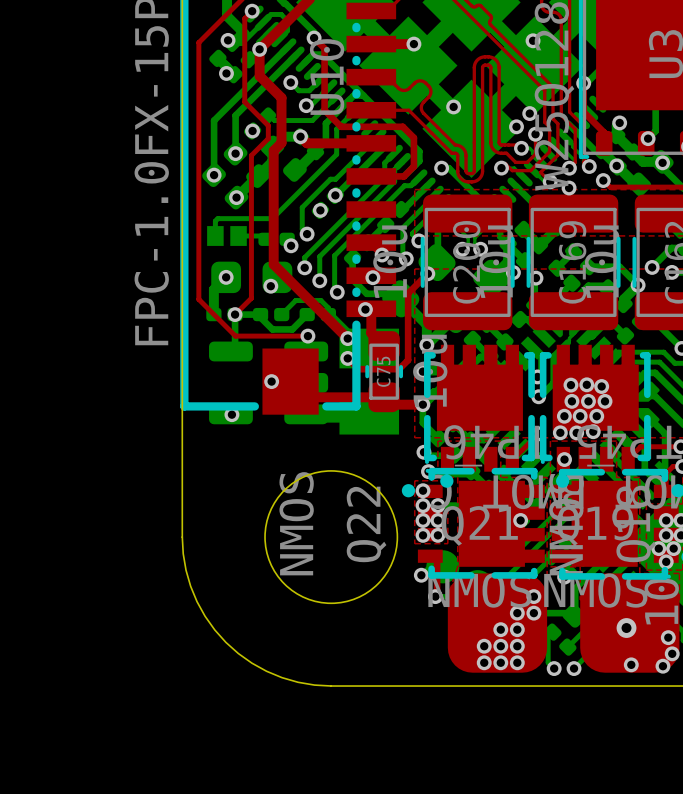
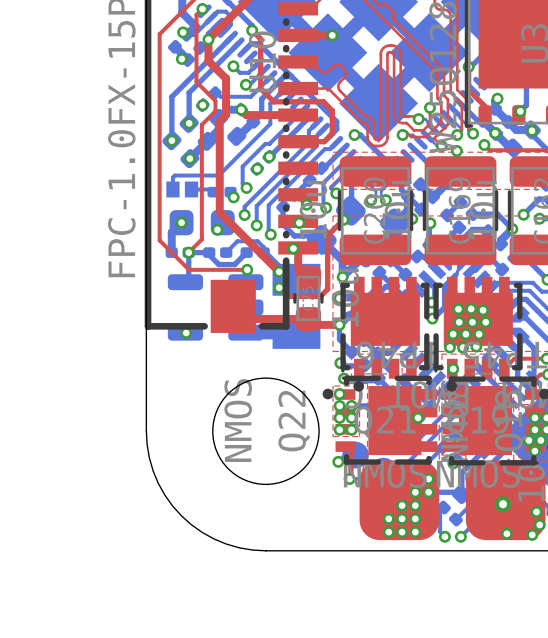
via: (533, 40) -> none
via: (453, 106) -> none
via: (529, 113) -> none
via: (516, 126) -> none
via: (271, 381) -> none

